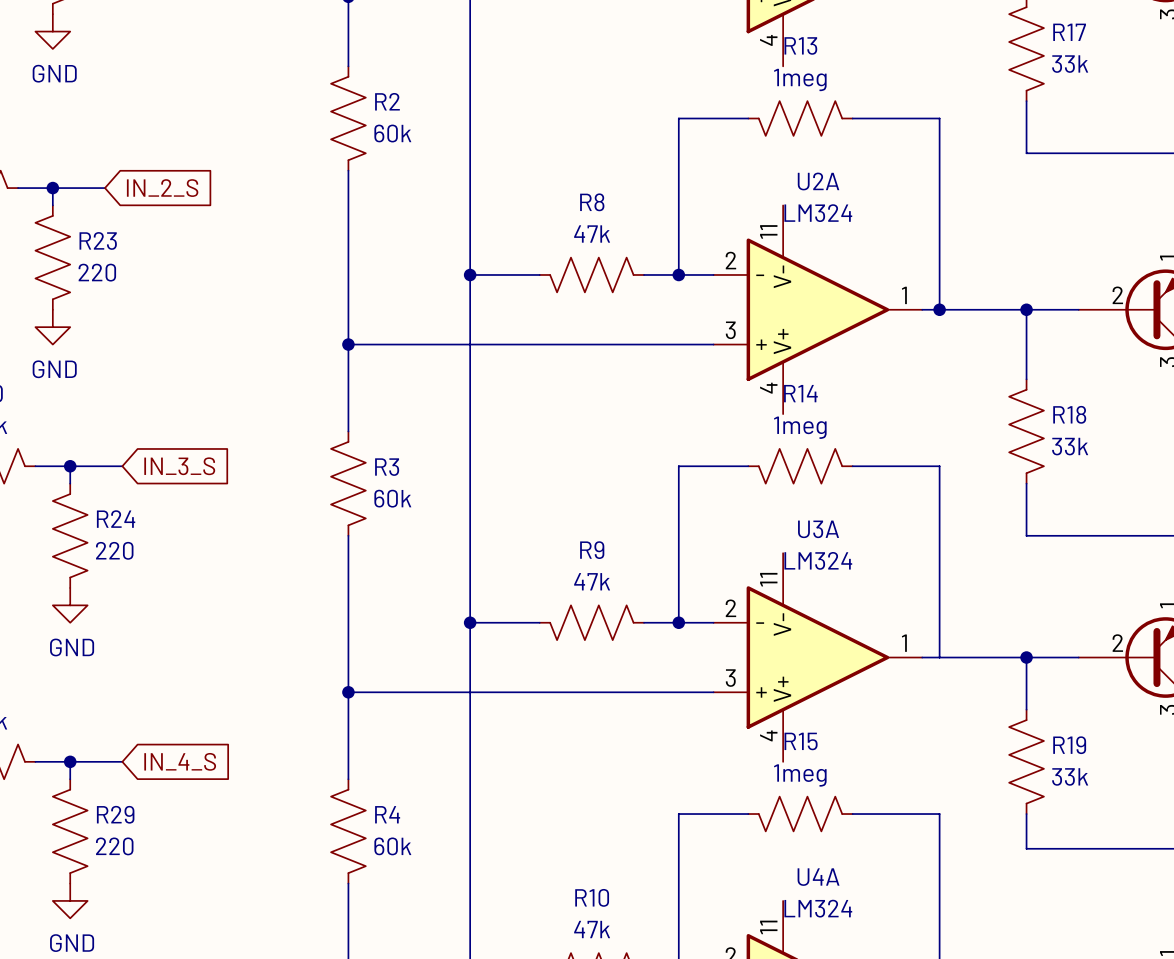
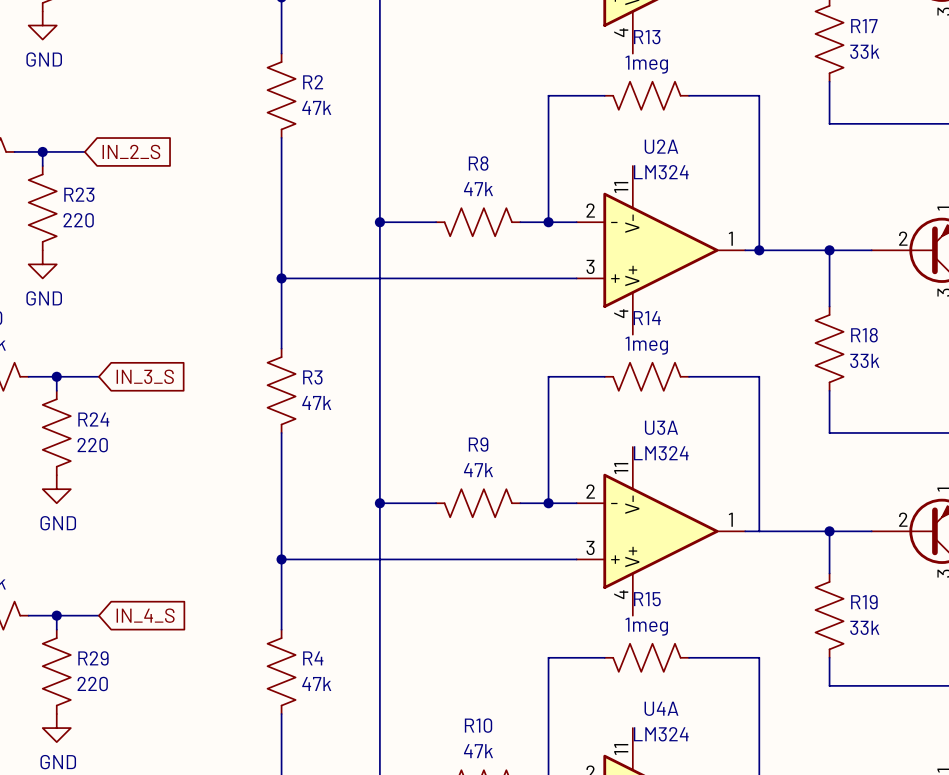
R2 value: 60k (392, 133) -> 47k (316, 107)
R3 value: 60k (392, 498) -> 47k (316, 402)
R4 value: 60k (392, 846) -> 47k (316, 683)

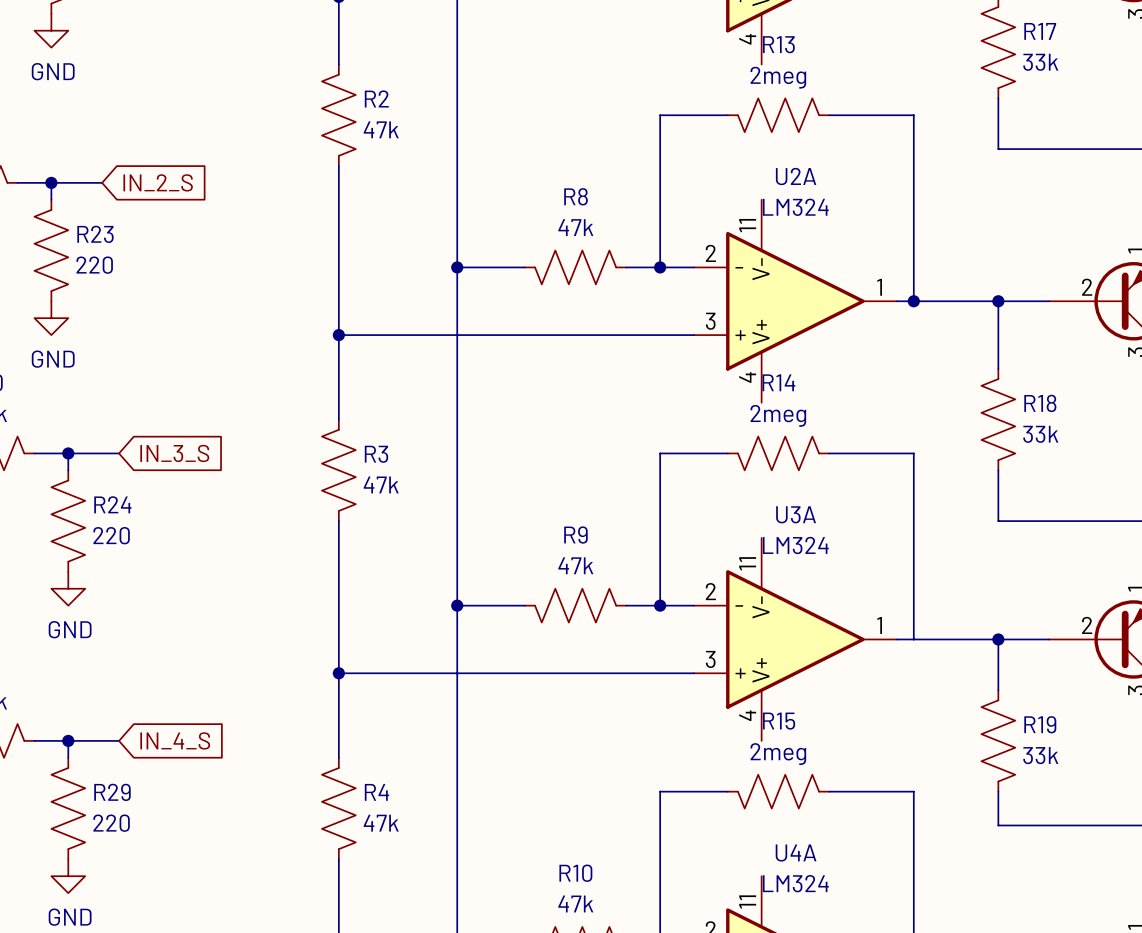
R13 value: 1meg (646, 64) -> 2meg (778, 77)
R14 value: 1meg (646, 345) -> 2meg (778, 415)
R15 value: 1meg (646, 626) -> 2meg (778, 754)

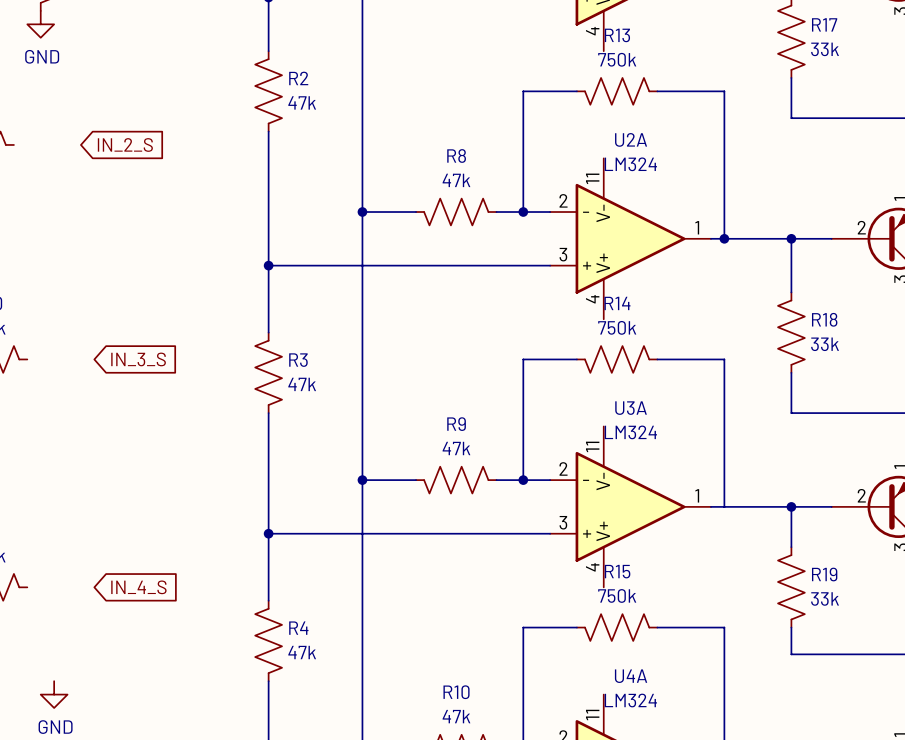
R13 value: 2meg (778, 77) -> 750k (617, 59)
wire: (17, 182) (102, 182) -> none
wire: (51, 182) (51, 199) -> none
junction: (51, 182) -> none
R23: 220 (51, 250) -> none
power symbol: GND (51, 318) -> none
R14 value: 2meg (778, 415) -> 750k (617, 327)
wire: (34, 453) (119, 453) -> none
wire: (68, 453) (68, 470) -> none
junction: (68, 453) -> none
R24: 220 (68, 521) -> none
power symbol: GND (68, 588) -> none
wire: (34, 740) (119, 740) -> none
wire: (68, 740) (68, 757) -> none
junction: (68, 740) -> none
R15 value: 2meg (778, 754) -> 750k (617, 595)
R29: 220 (68, 808) -> none

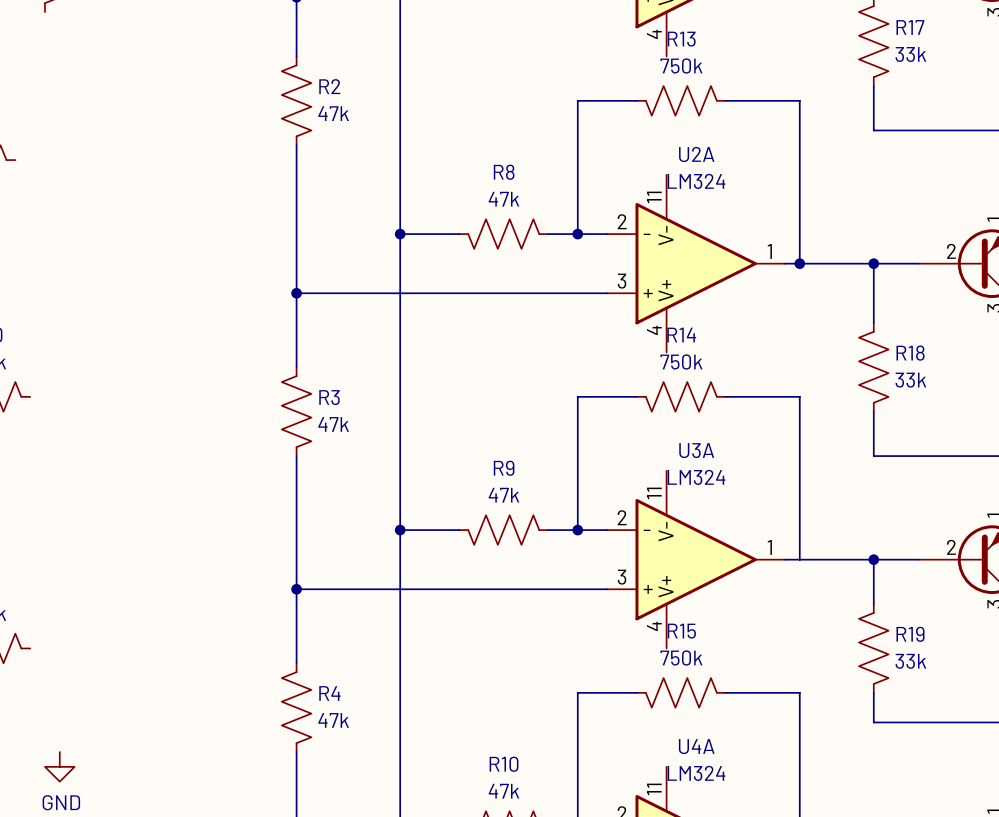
power symbol: GND (40, 24) -> none
global label: IN_2_S (125, 144) -> none
global label: IN_3_S (138, 359) -> none
global label: IN_4_S (138, 587) -> none

